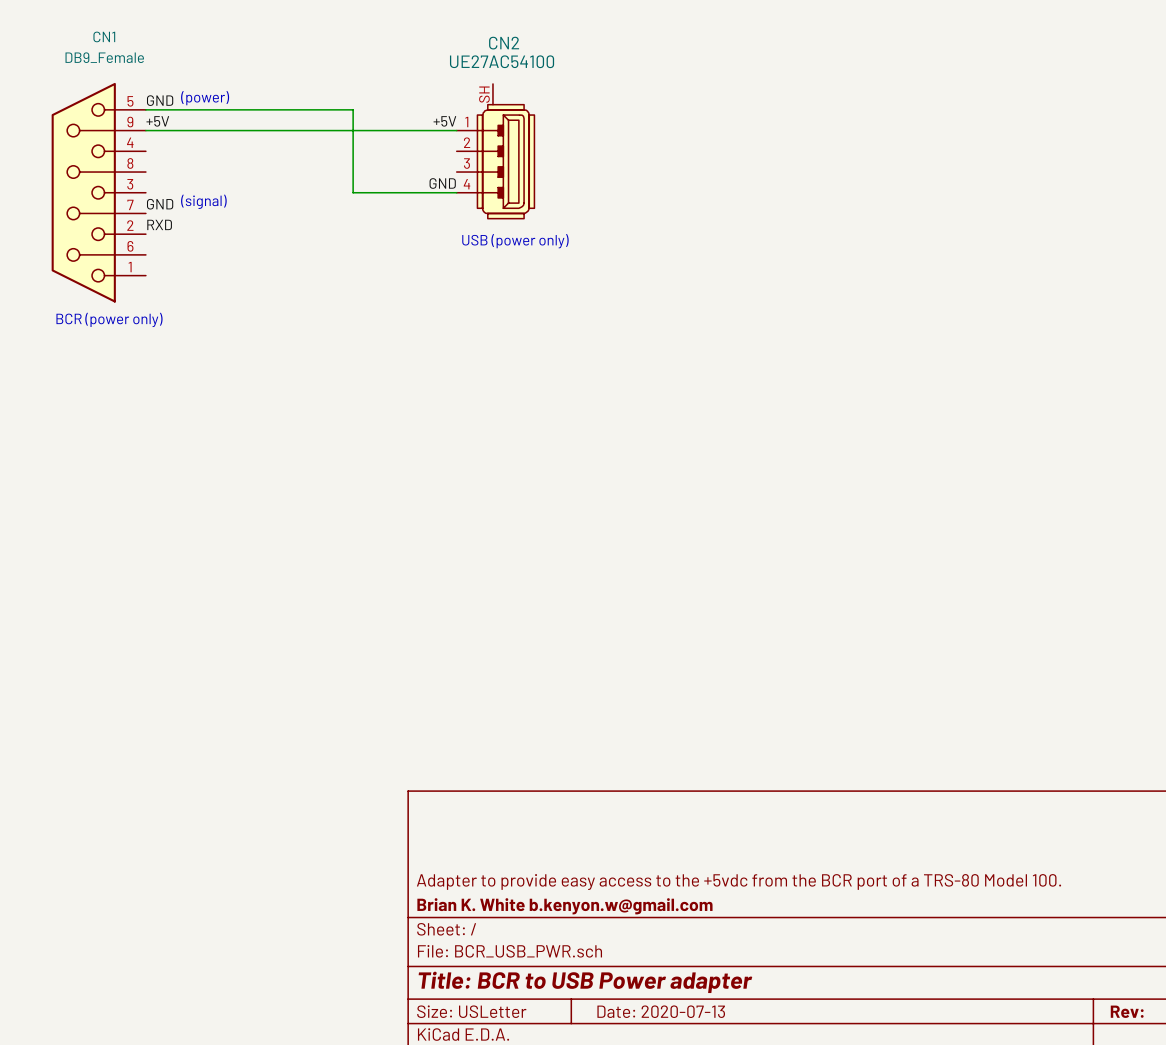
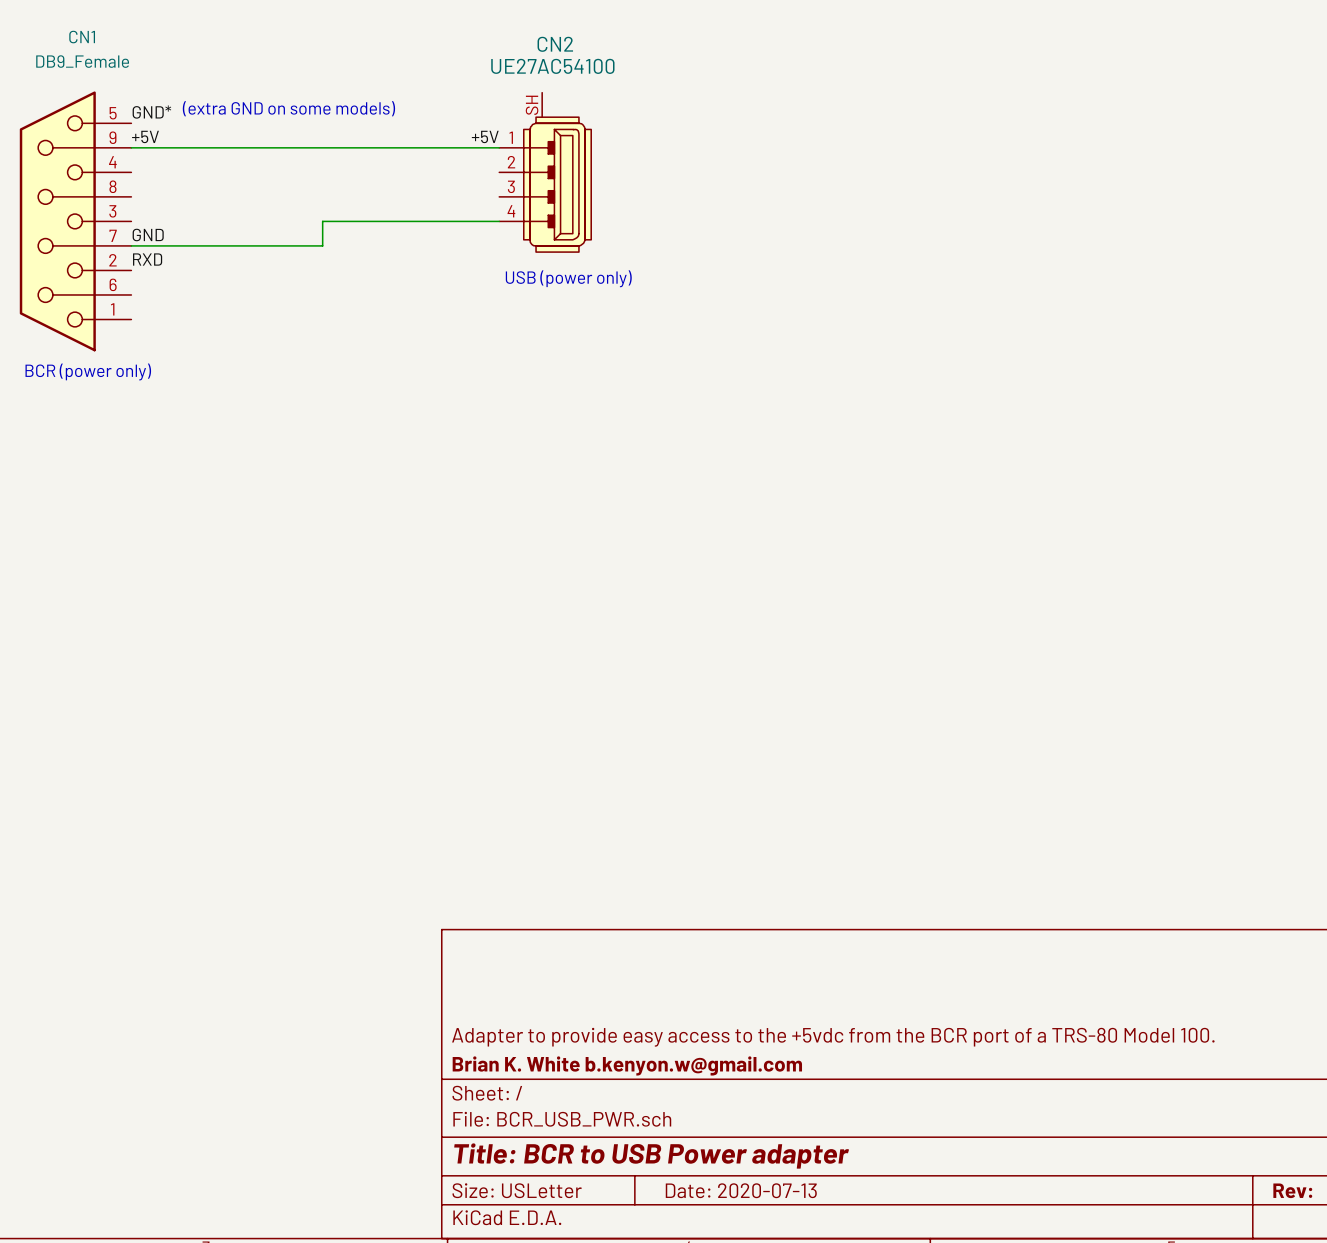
text: none -> (extra GND on some models) (288, 108)
text: (power) (205, 98) -> none
label: GND (160, 100) -> GND* (151, 112)
wire: (145, 109) (353, 109) (353, 192) -> (131, 245) (322, 245) (322, 221) (376, 221)
label: GND (442, 183) -> none
text: (signal) (203, 201) -> none

